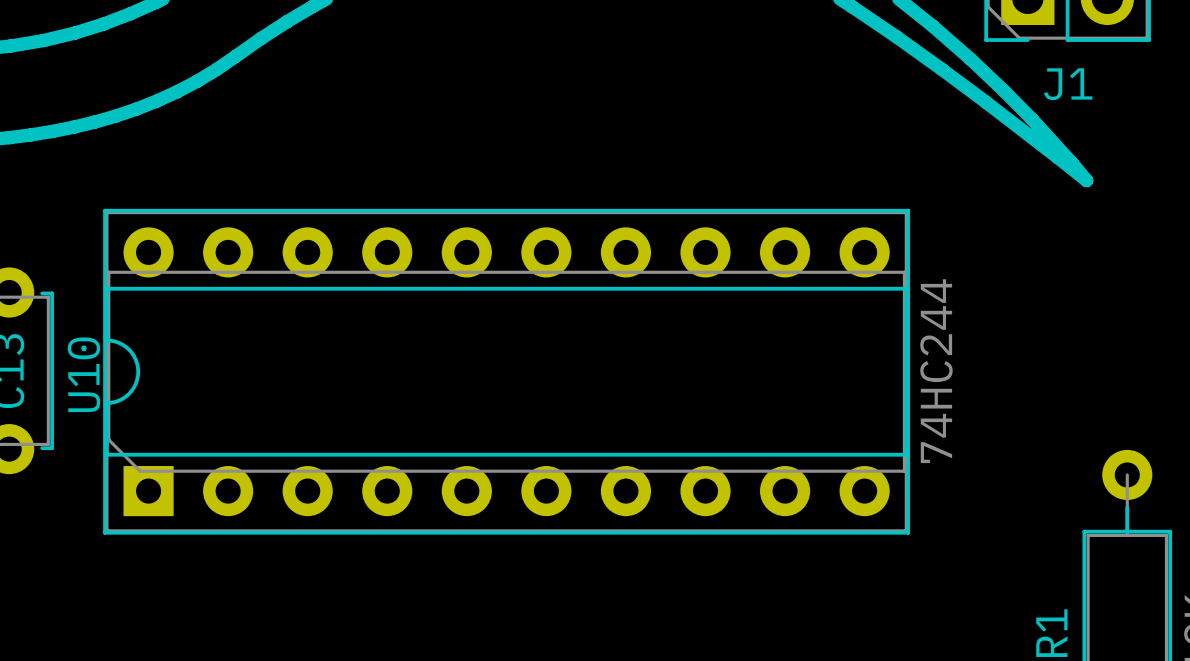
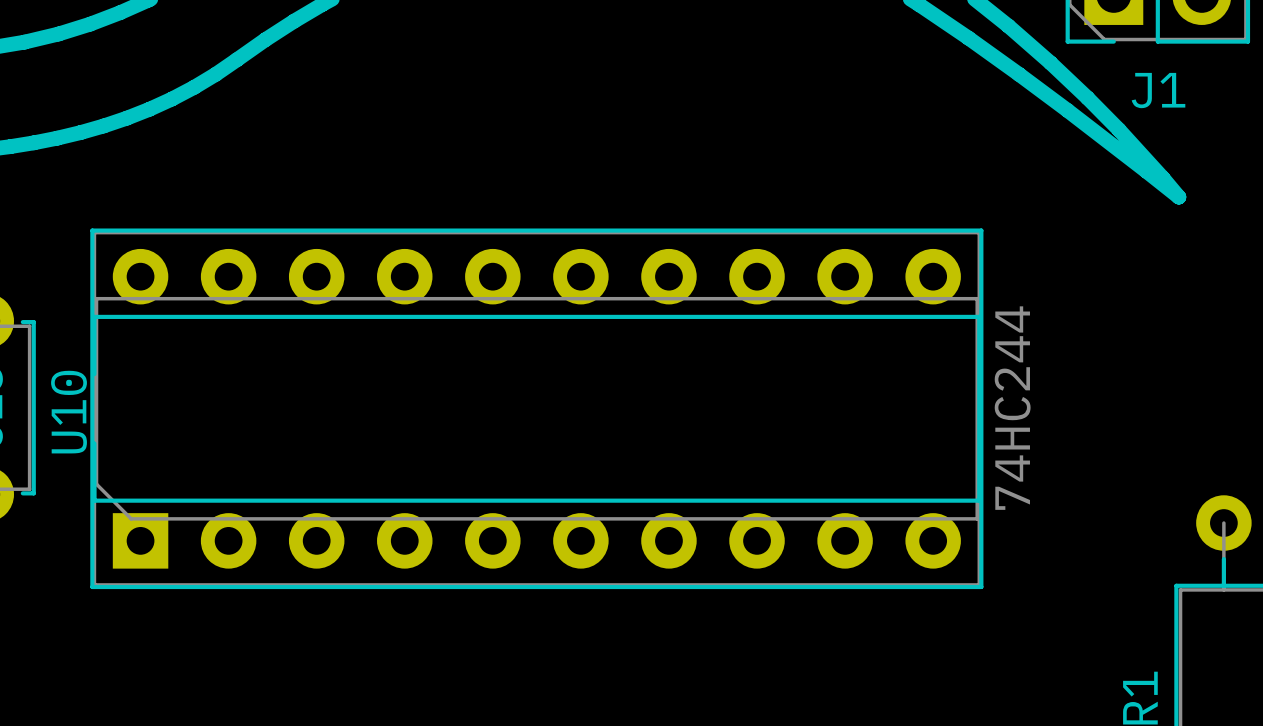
U10 footprint: [103, 208, 911, 535] -> [90, 228, 984, 590]

